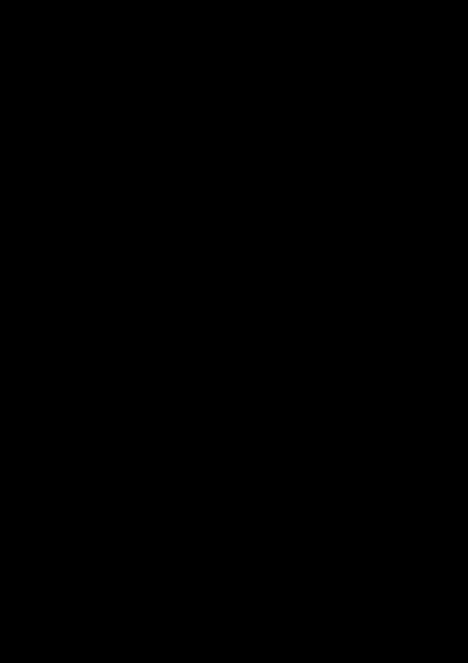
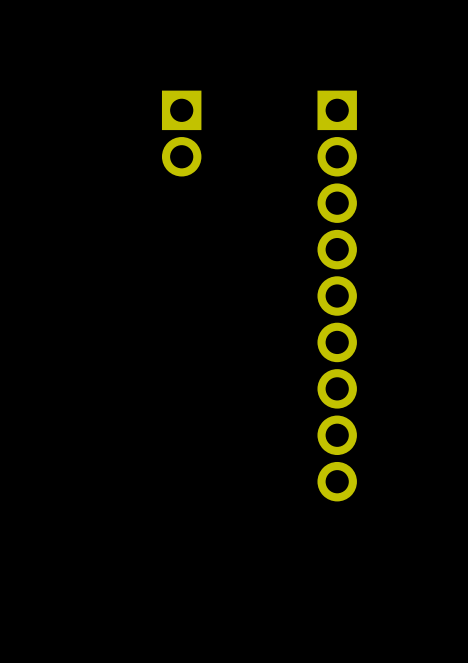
part: none -> (181, 133)
part: none -> (337, 296)

